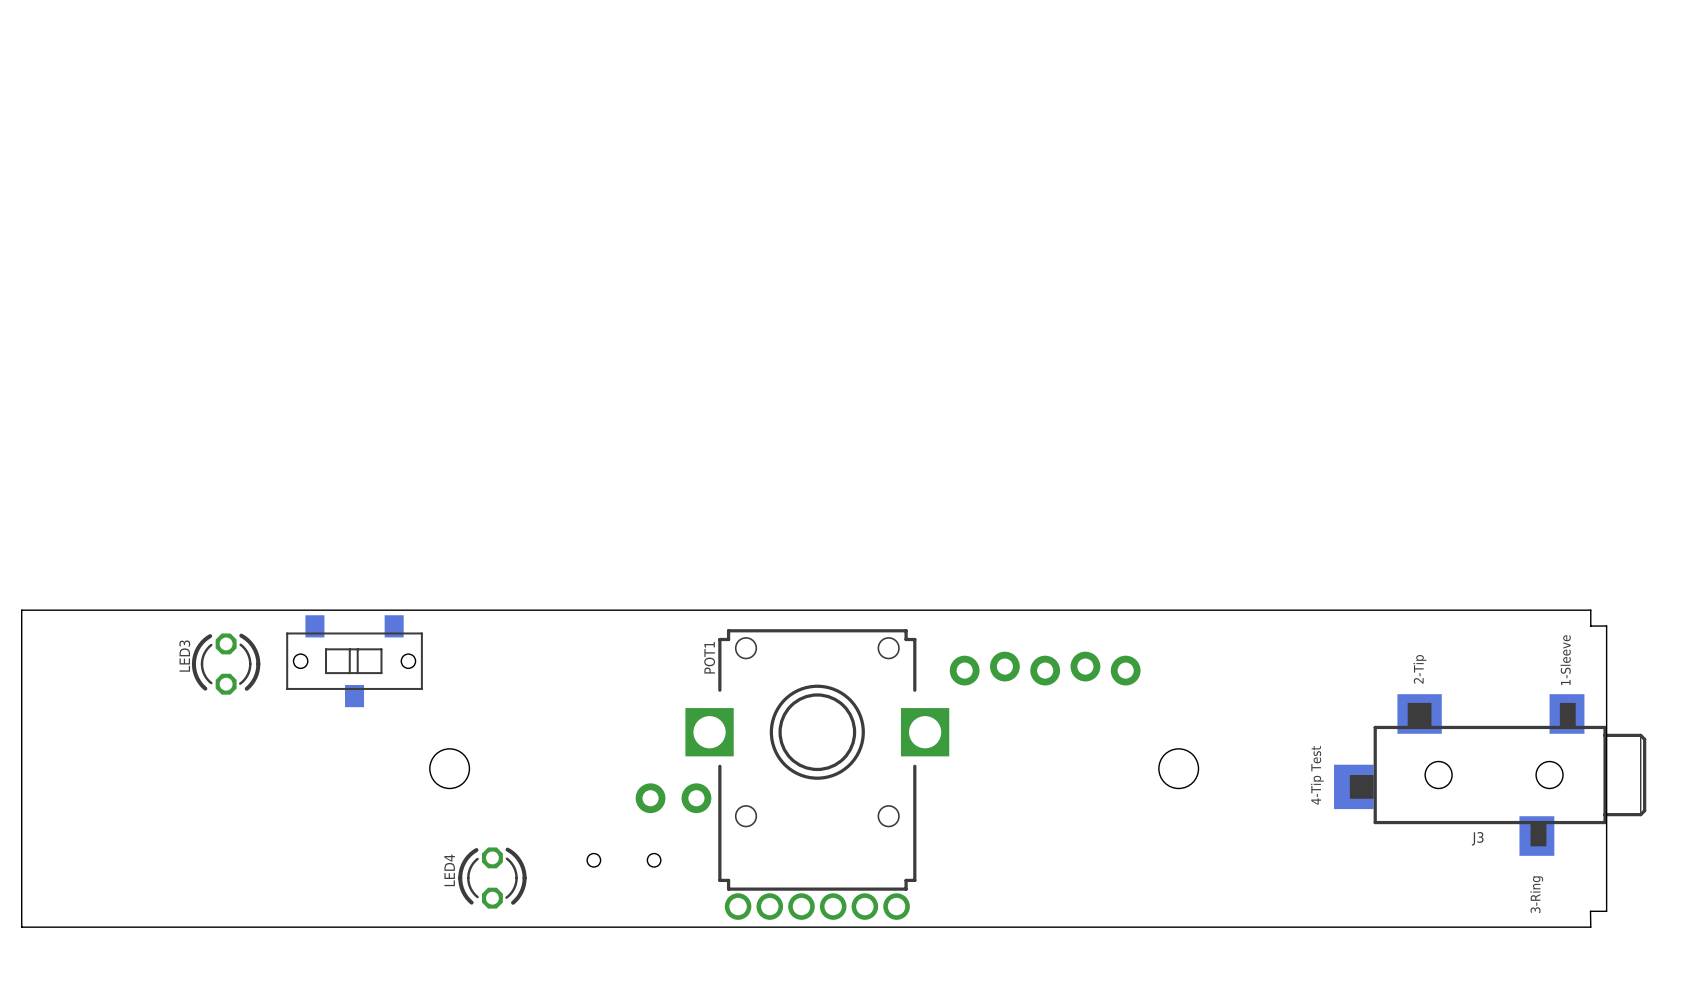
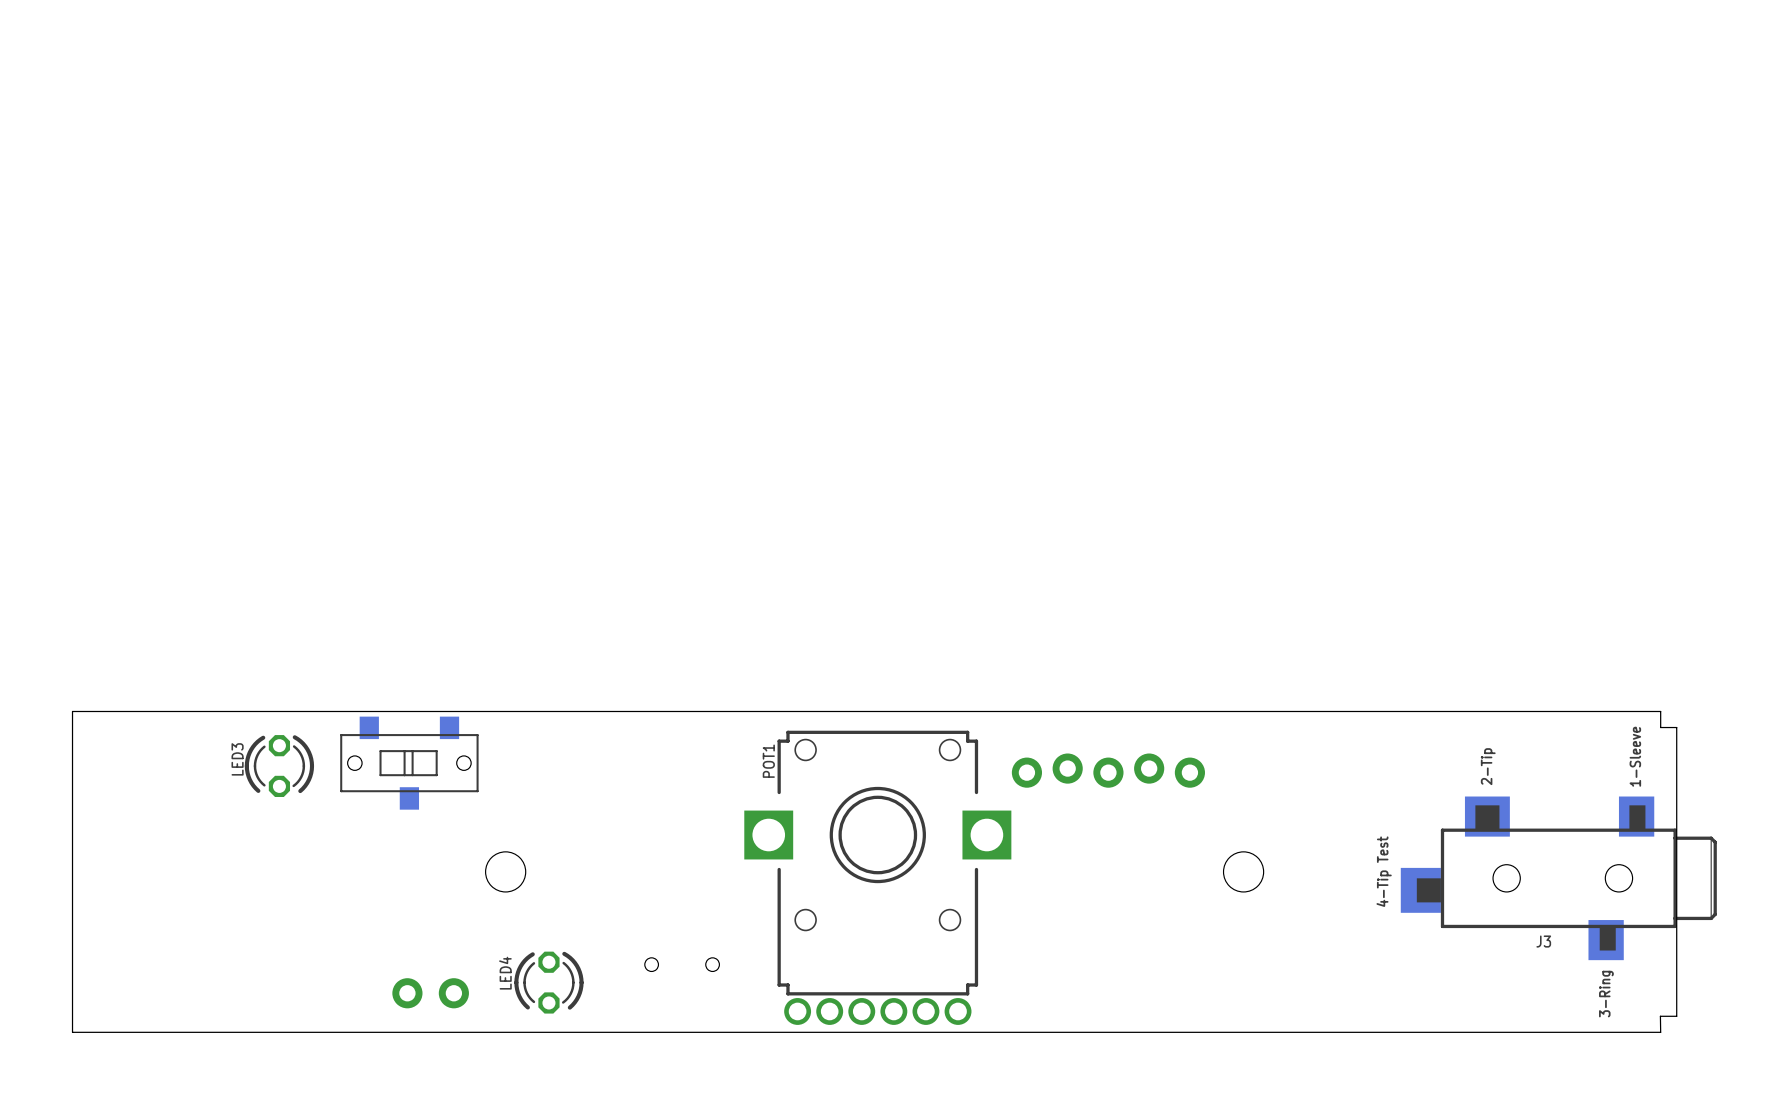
part position: (673, 798) -> (430, 993)

